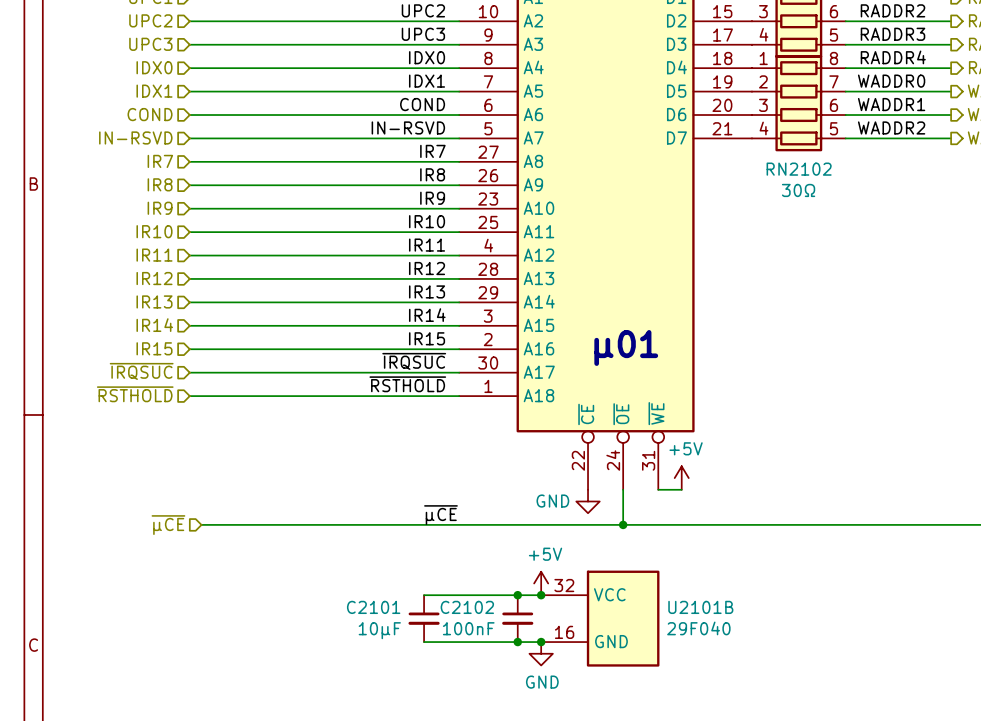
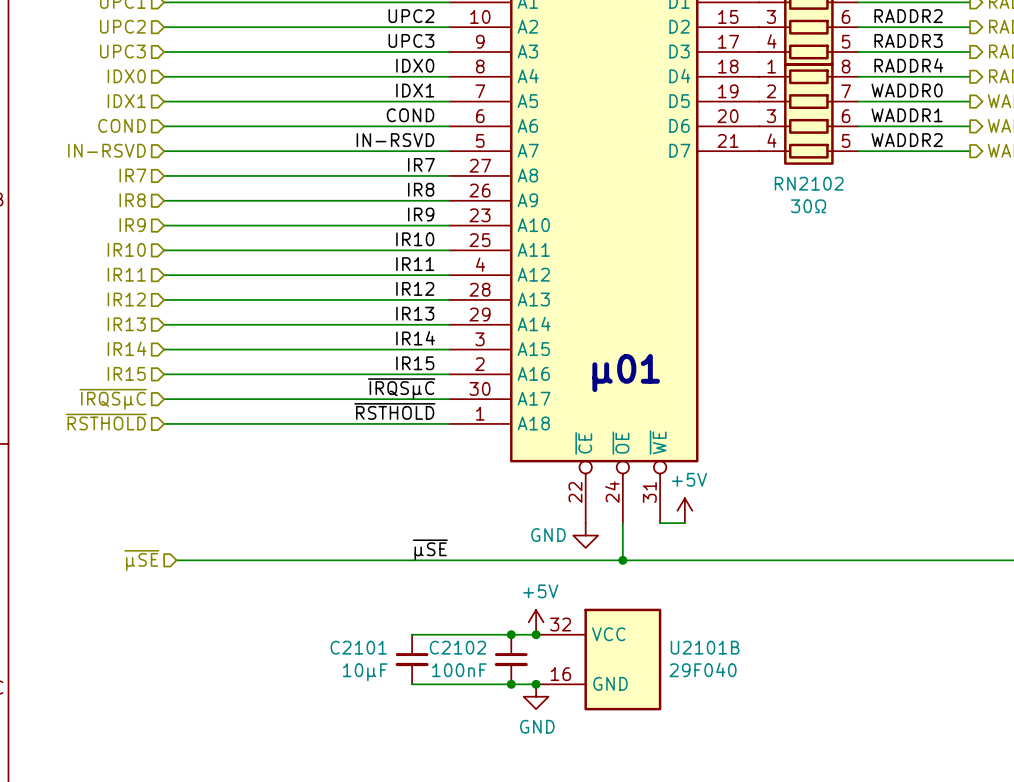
label: ~{IRQSUC} (414, 361) -> ~{IRQSµC} (401, 388)
hierarchical label: ~{IRQSUC} (141, 371) -> ~{IRQSµC} (113, 399)
label: ~{µCE} (440, 515) -> ~{µSE} (430, 549)
hierarchical label: ~{µCE} (168, 525) -> ~{µSE} (141, 560)

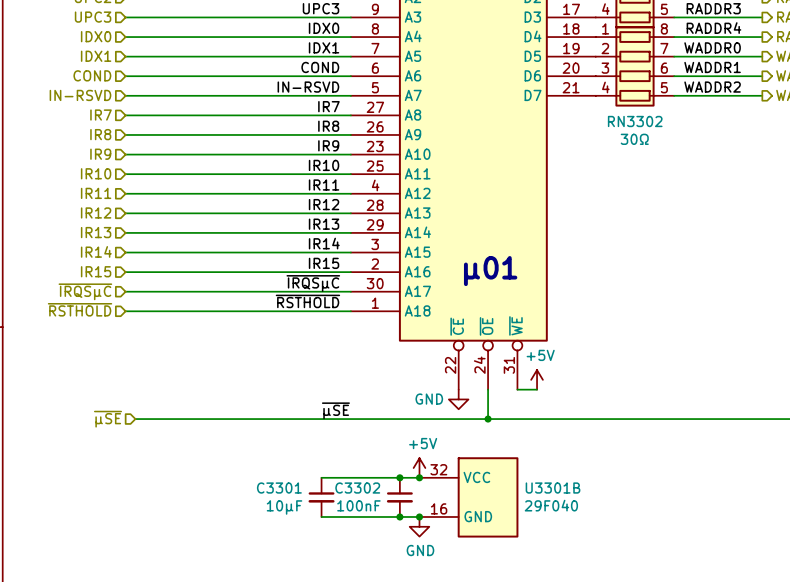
RN2102 name: RN2102 (809, 183) -> RN3302 (635, 121)
C2101 name: C2101 (358, 647) -> C3301 (279, 488)
C2102 name: C2102 (457, 647) -> C3302 (357, 488)
U2101B name: U2101B (705, 647) -> U3301B (553, 488)

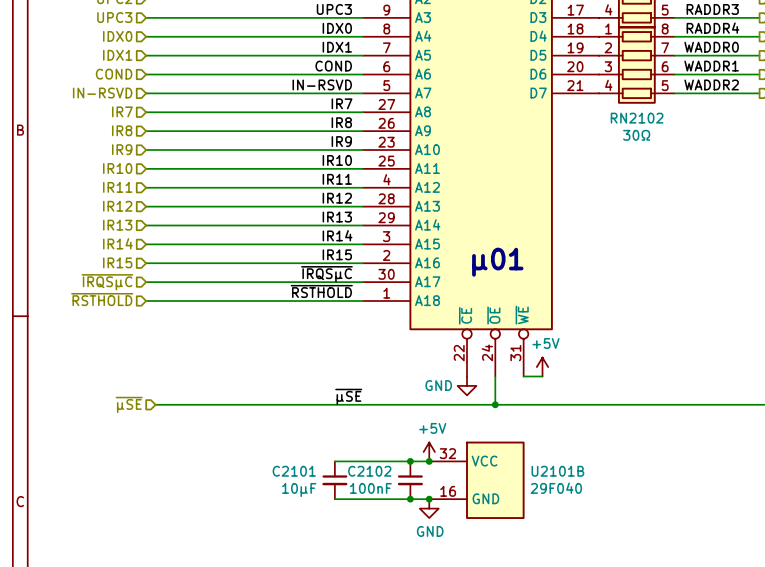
RN3302 name: RN3302 (635, 121) -> RN2102 (637, 118)
C3301 name: C3301 (279, 488) -> C2101 (294, 471)
C3302 name: C3302 (357, 488) -> C2102 (369, 471)
U3301B name: U3301B (553, 488) -> U2101B (557, 471)

